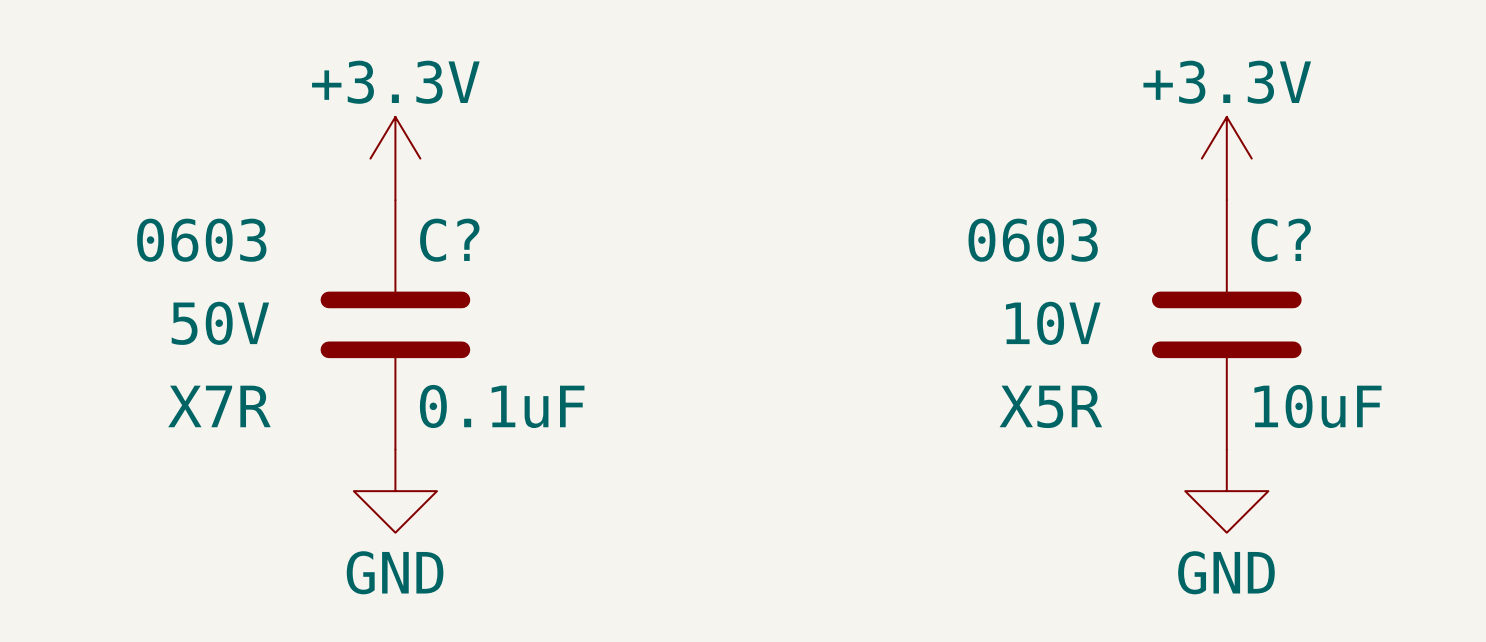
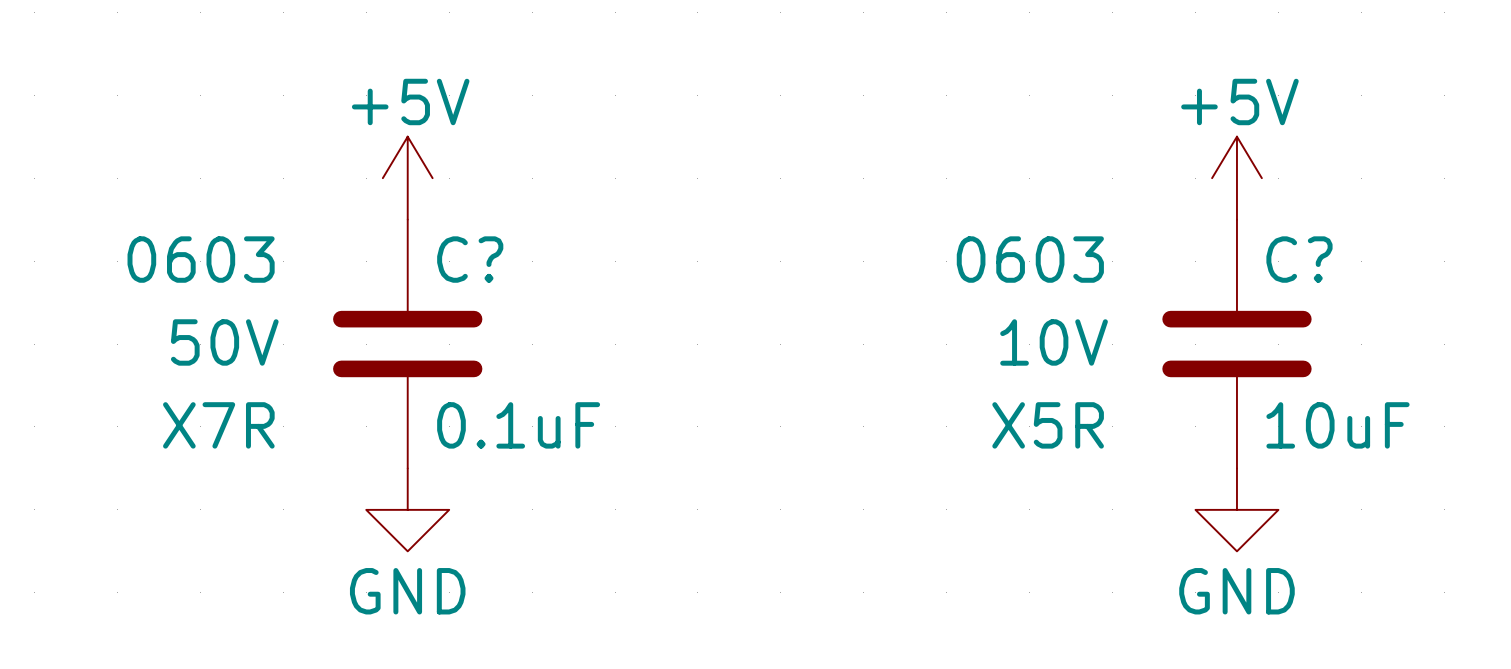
power symbol: +3.3V (395, 158) -> +5V (407, 178)
power symbol: +3.3V (1226, 158) -> +5V (1236, 178)

